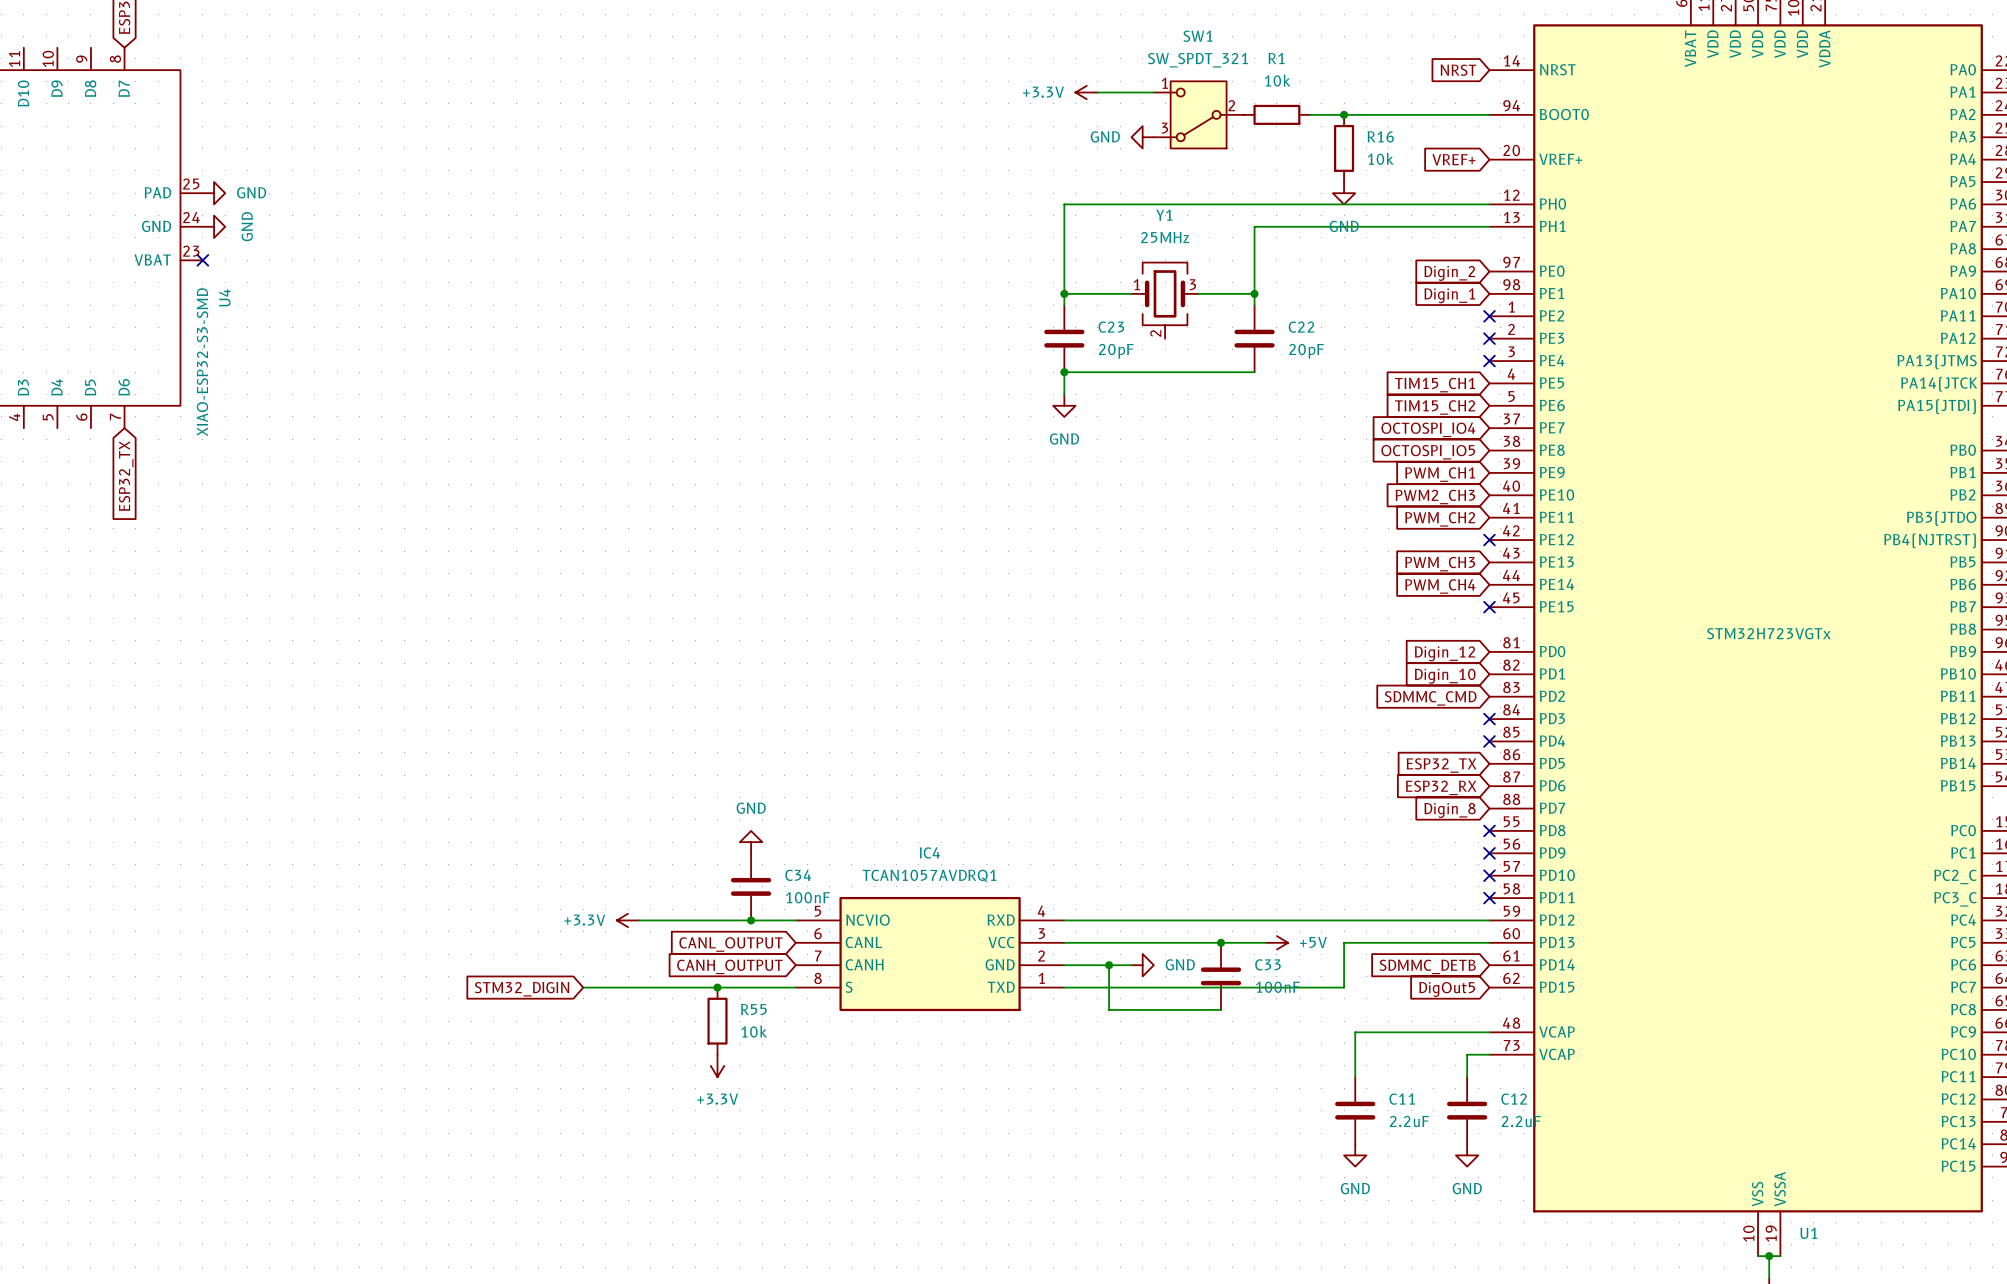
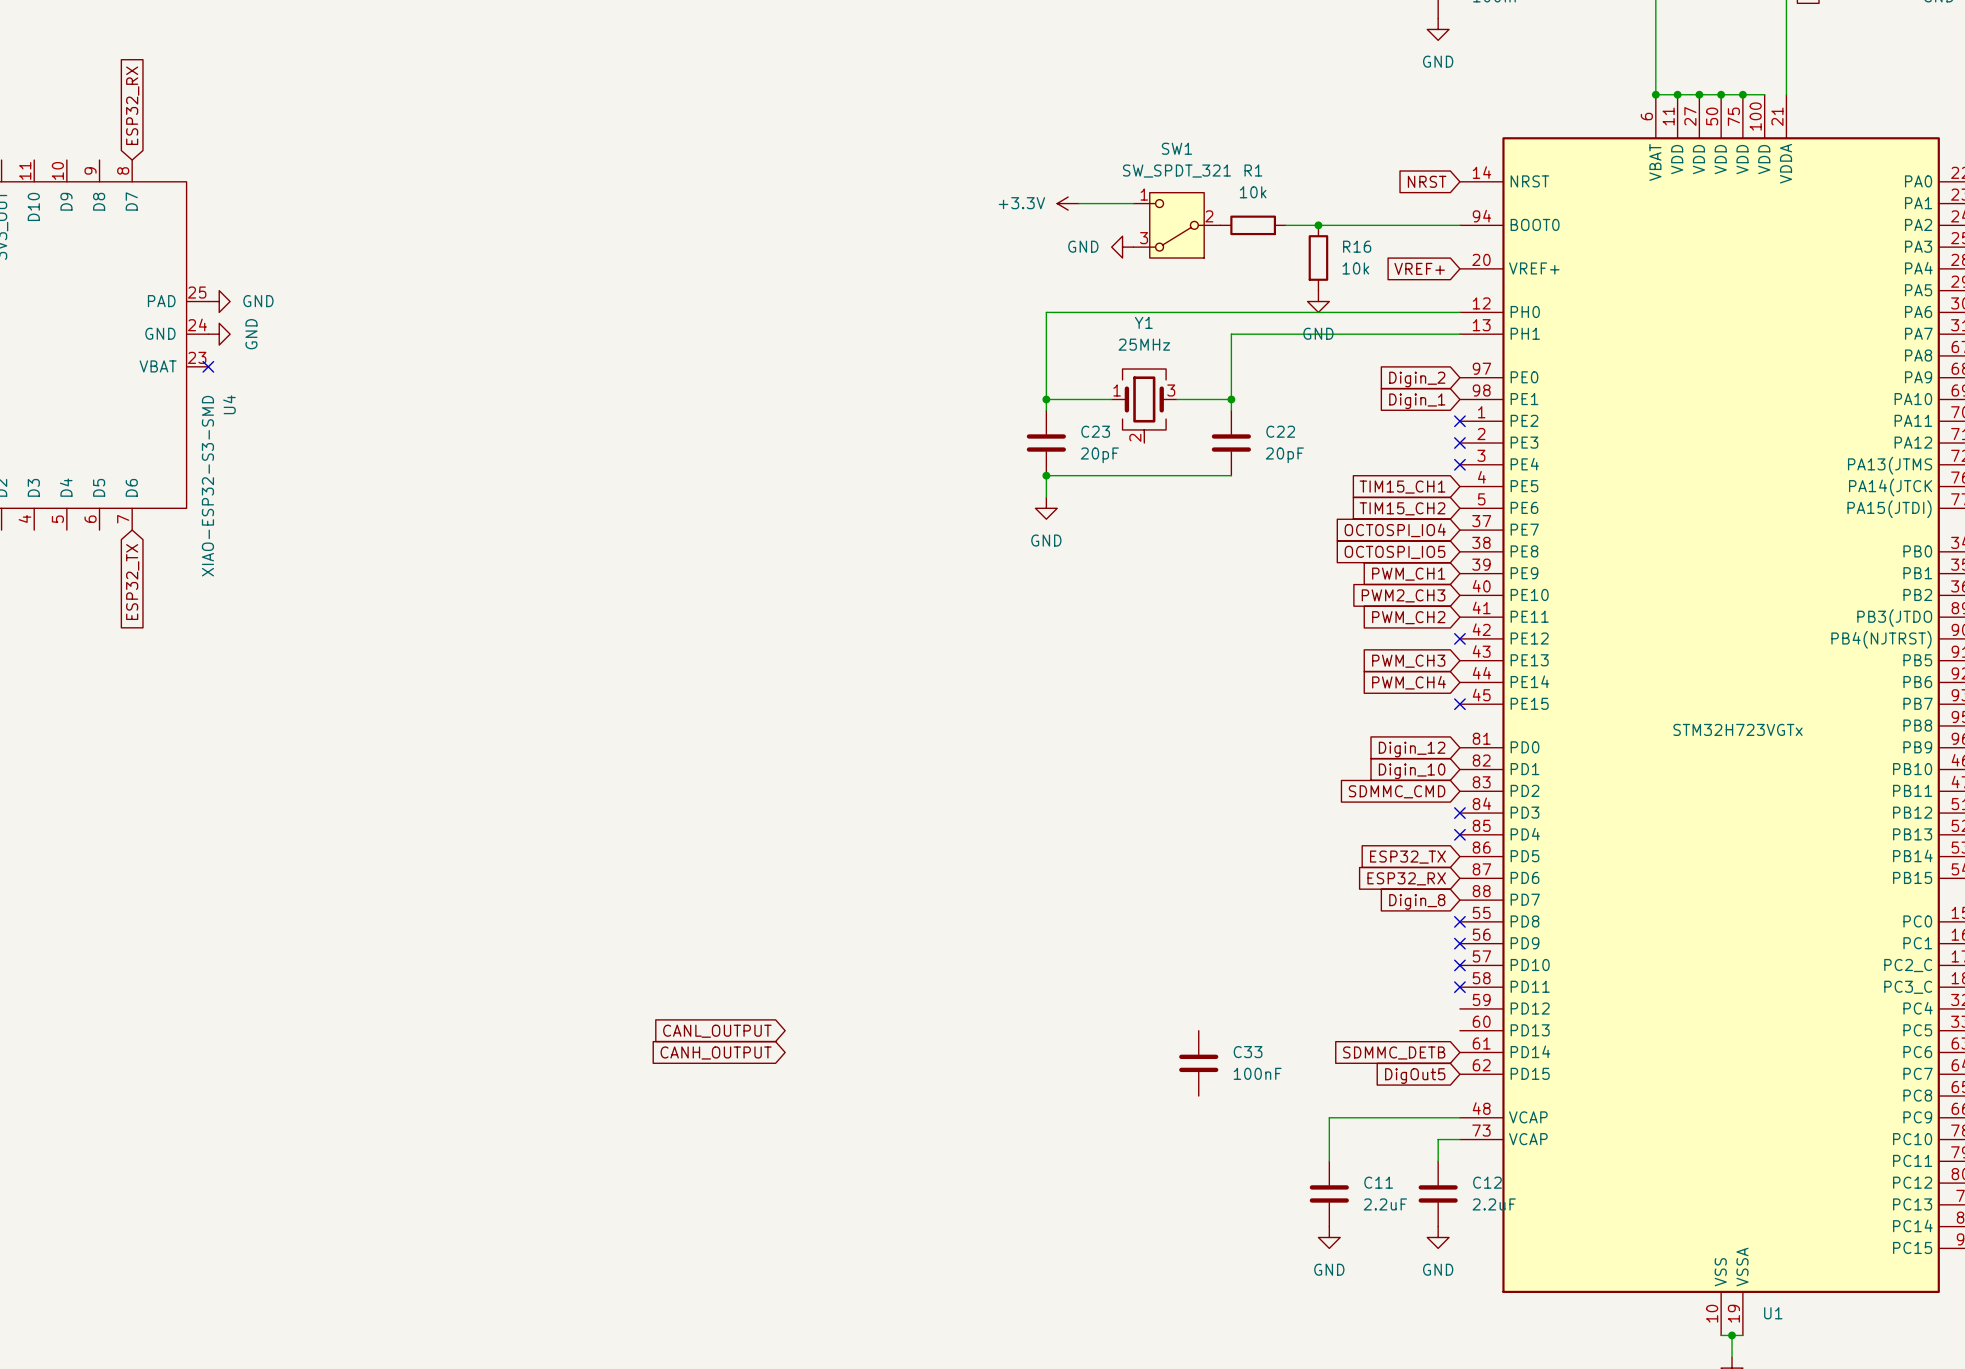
power symbol: GND (751, 842) -> none
C34: 100nF (751, 886) -> none
power symbol: +3.3V (628, 920) -> none
wire: (639, 920) (795, 920) -> none
junction: (751, 920) -> none
wire: (1064, 920) (1489, 920) -> none
wire: (1064, 942) (1265, 942) -> none
junction: (1220, 942) -> none
power symbol: +5V (1276, 942) -> none
wire: (1489, 942) (1344, 942) (1344, 987) (1064, 987) -> none
IC4: TCAN1057AVDRQ1 (930, 954) -> none
wire: (1064, 965) (1131, 965) -> none
wire: (1109, 965) (1109, 1009) (1220, 1009) -> none
junction: (1109, 965) -> none
power symbol: GND (1142, 965) -> none
wire: (583, 987) (795, 987) -> none
junction: (717, 987) -> none
global label: STM32_DIGIN (521, 989) -> none
R55: 10k (717, 1021) -> none
power symbol: +3.3V (717, 1065) -> none

